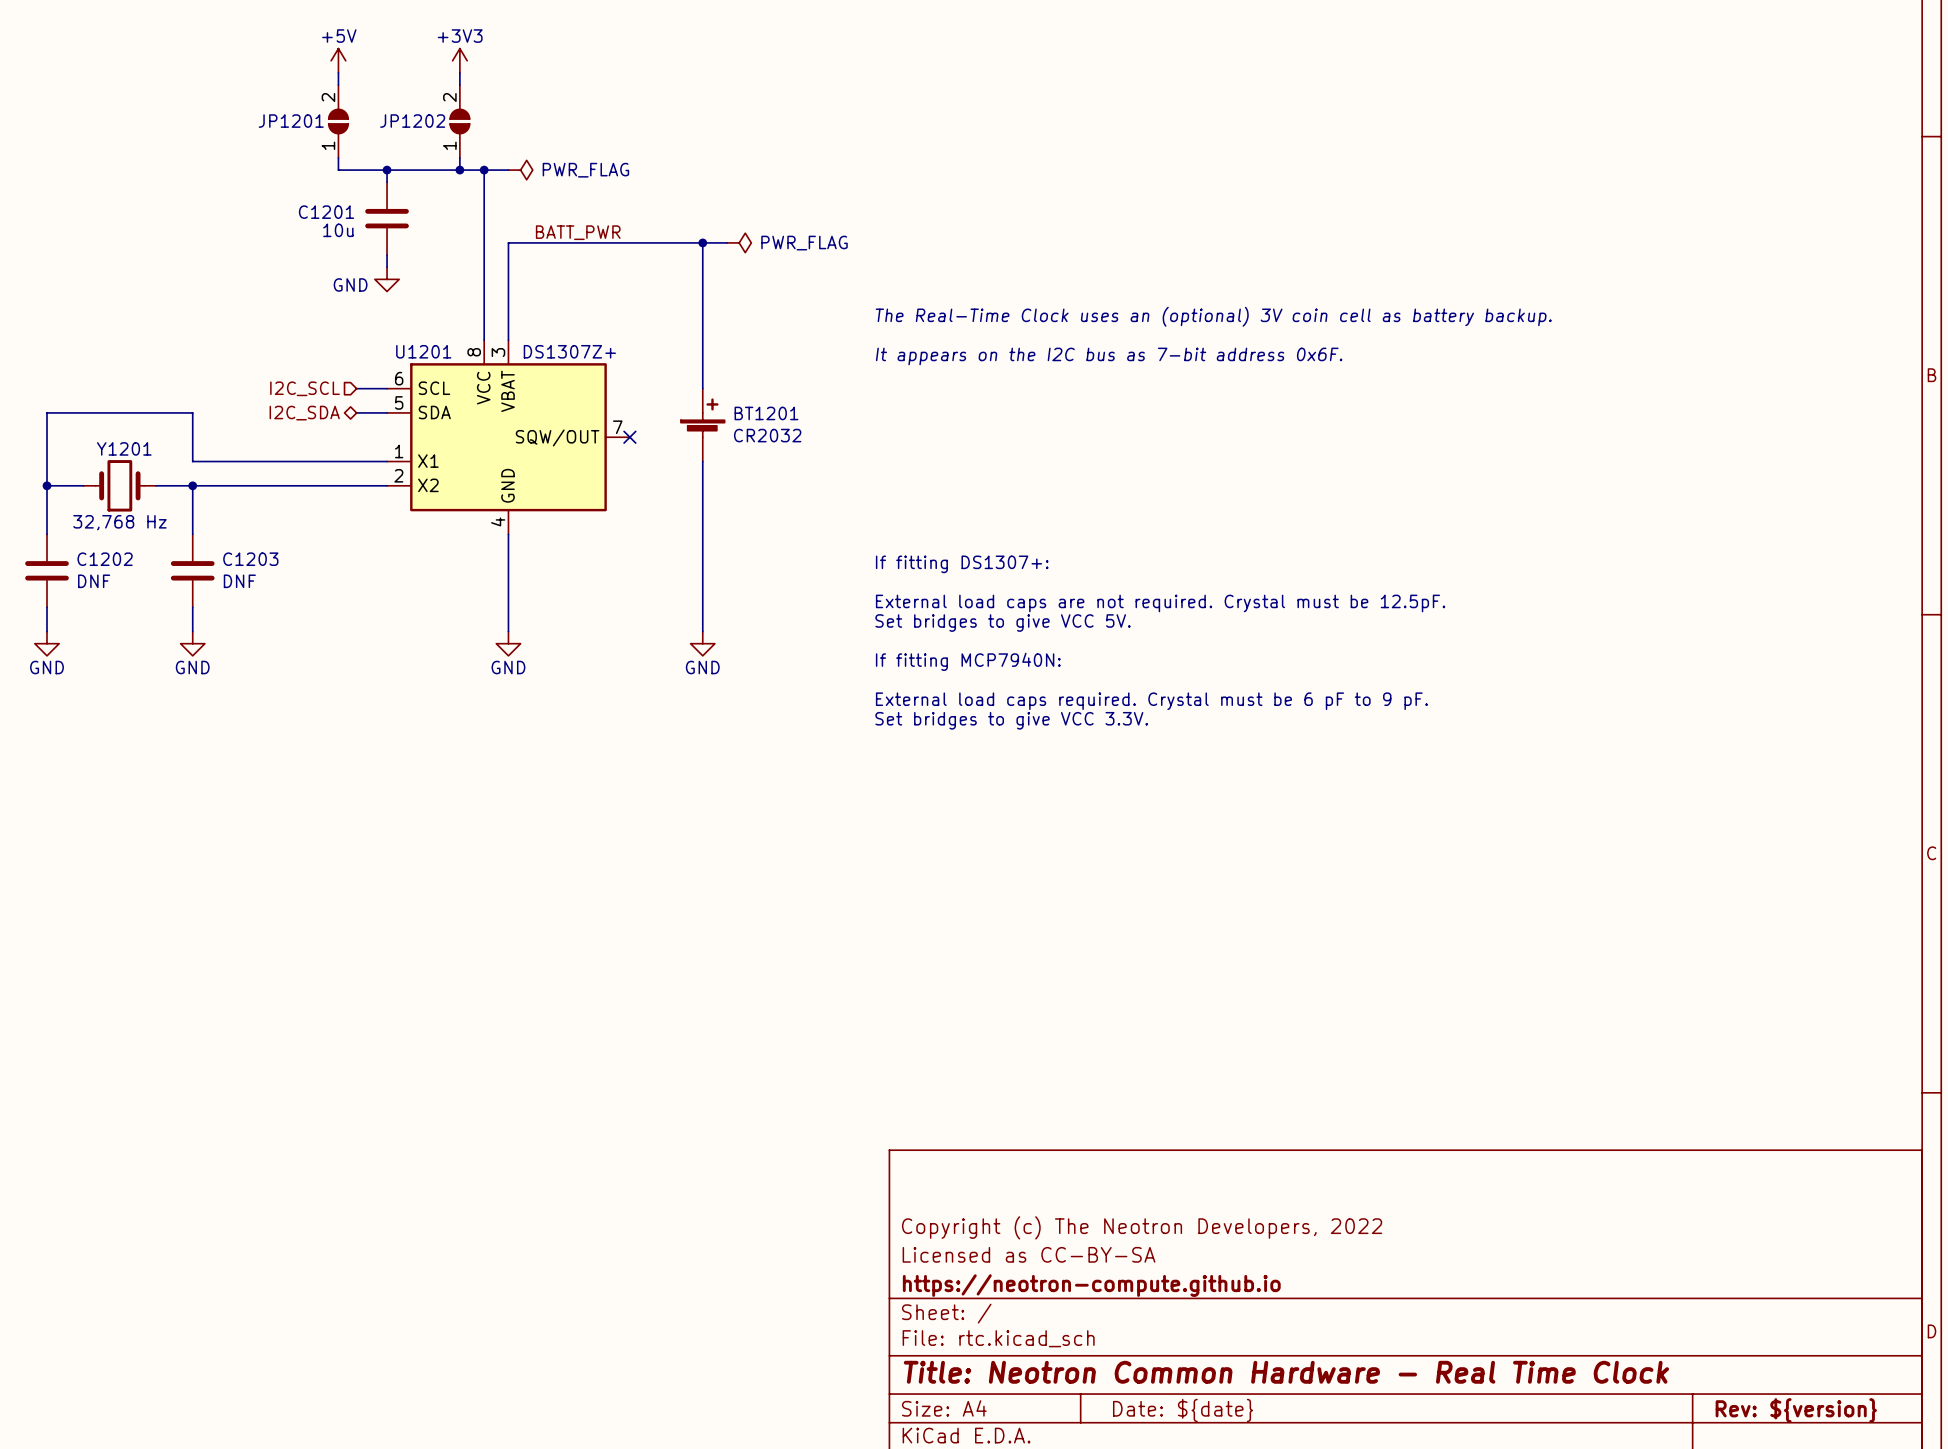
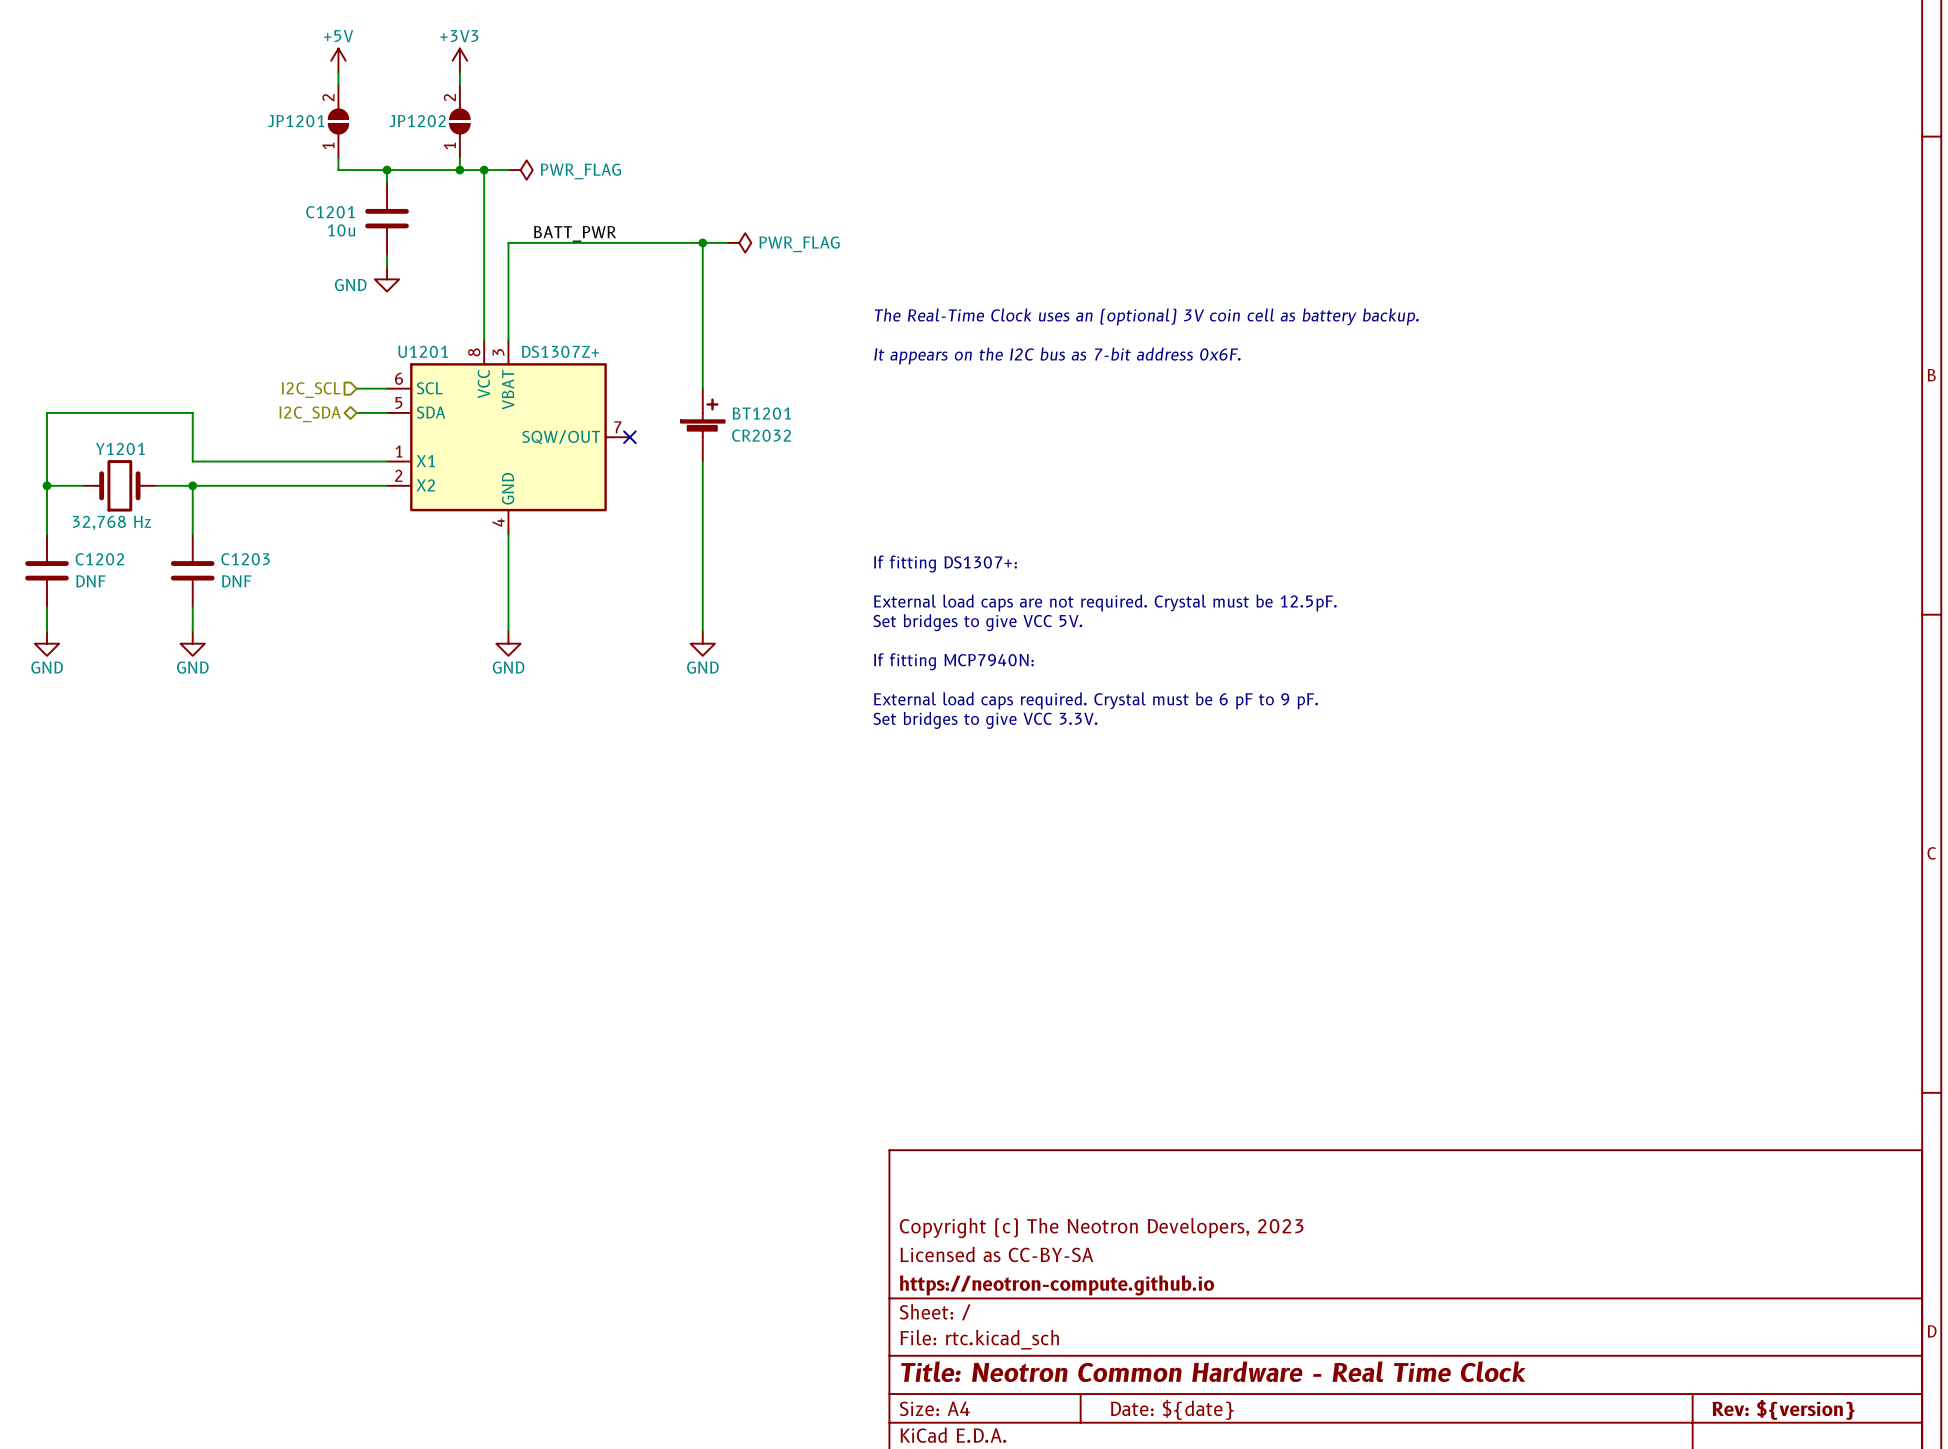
title block: Copyright (c) The Neotron Developers, 2022 (1142, 1227) -> Copyright (c) The Neotron Developers, 2023 (1101, 1228)

